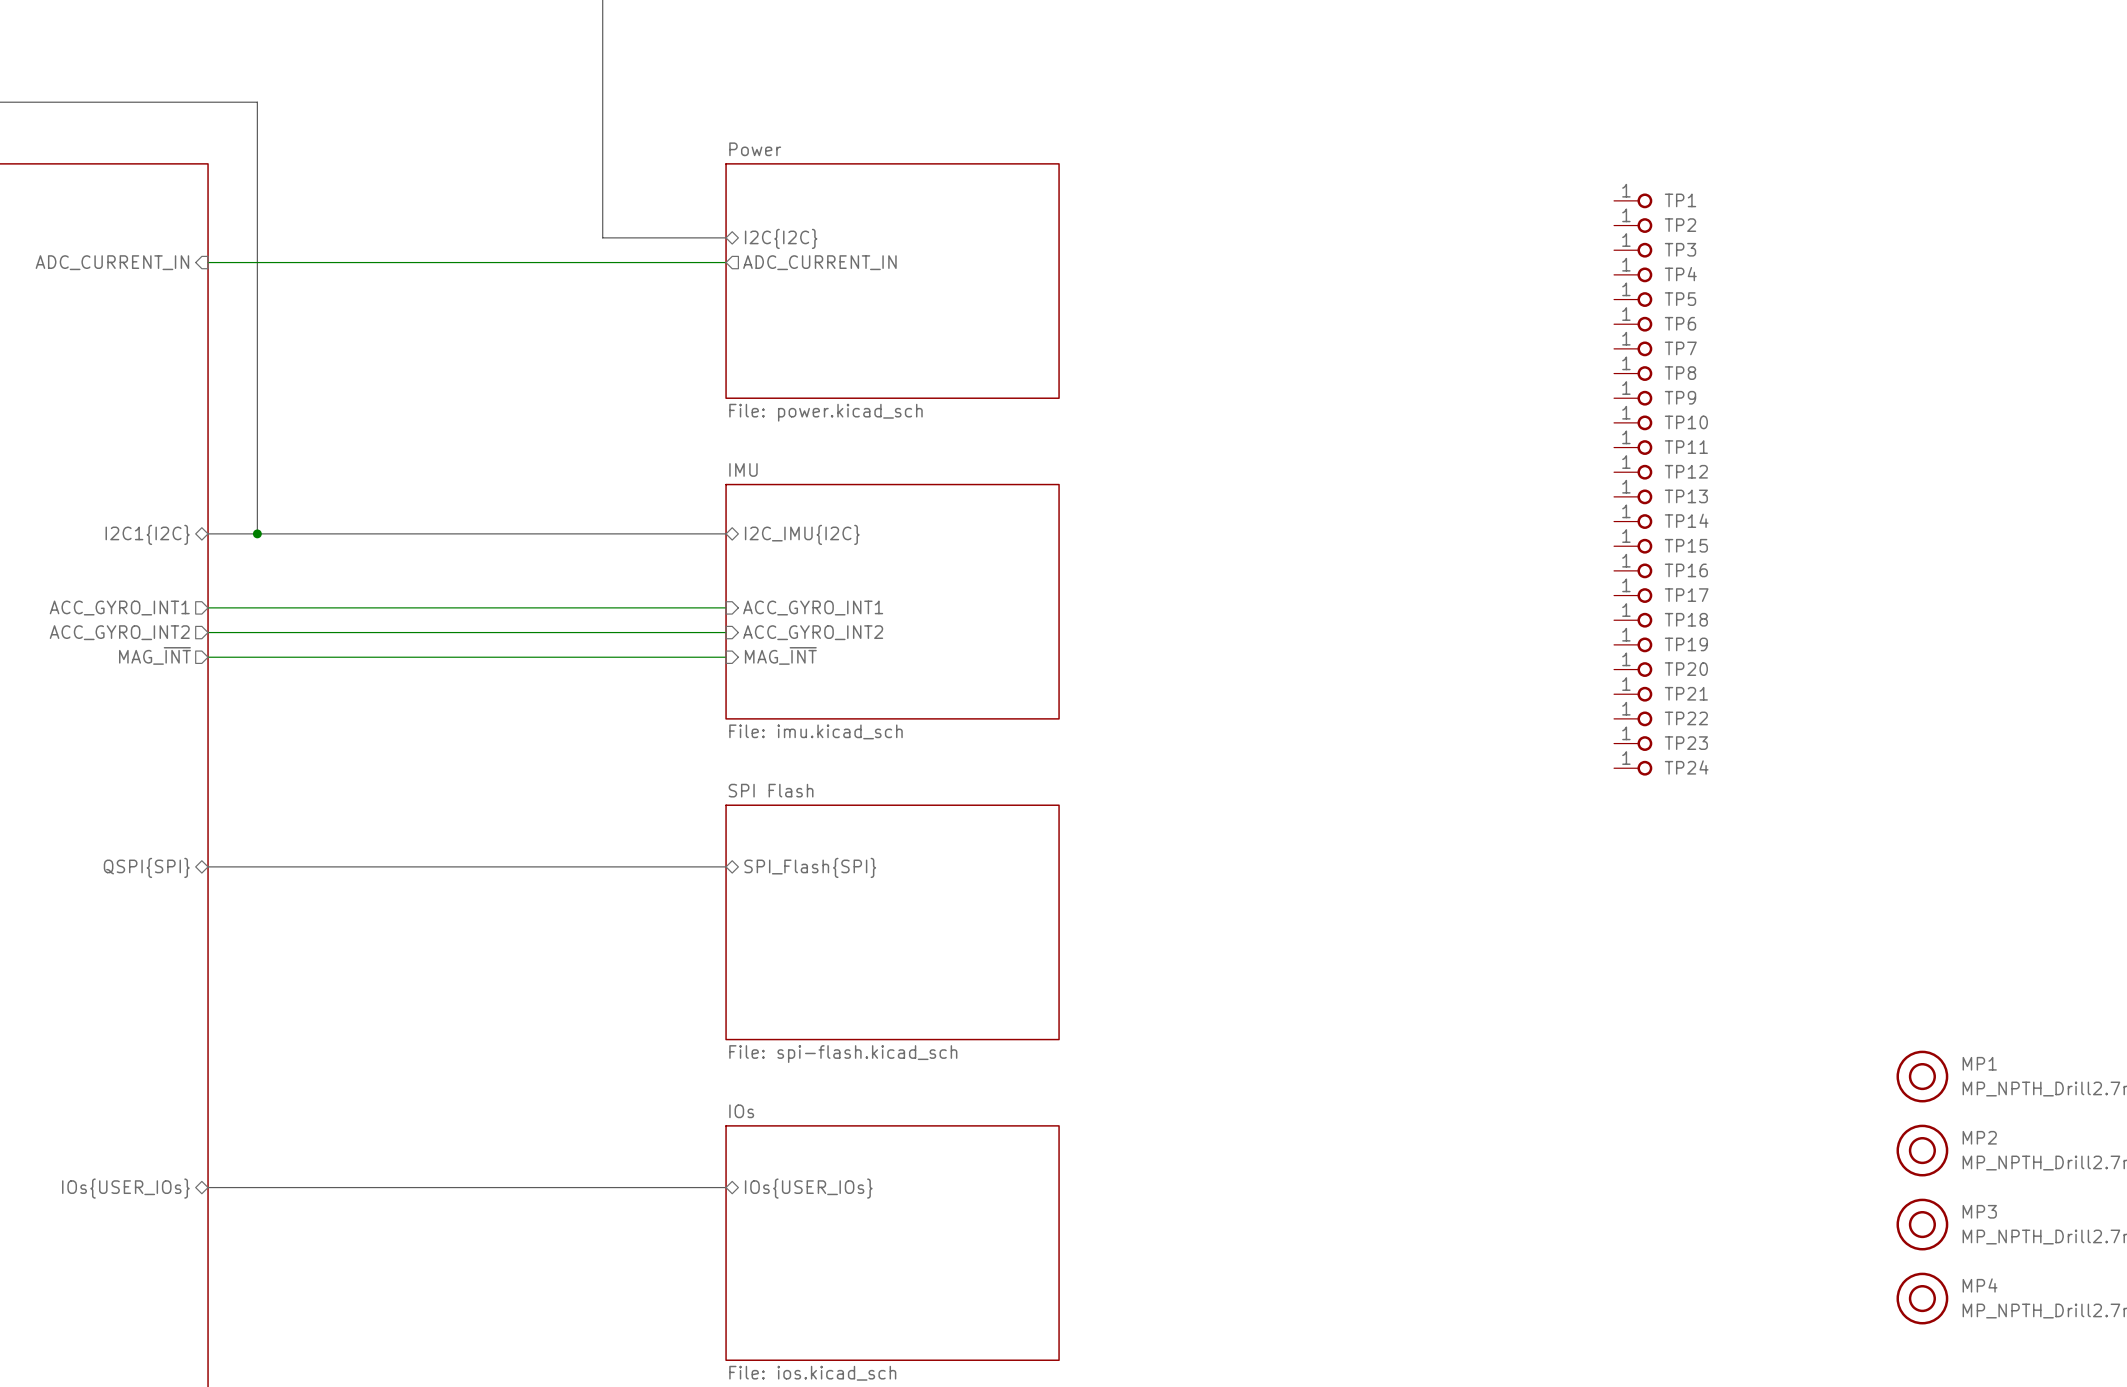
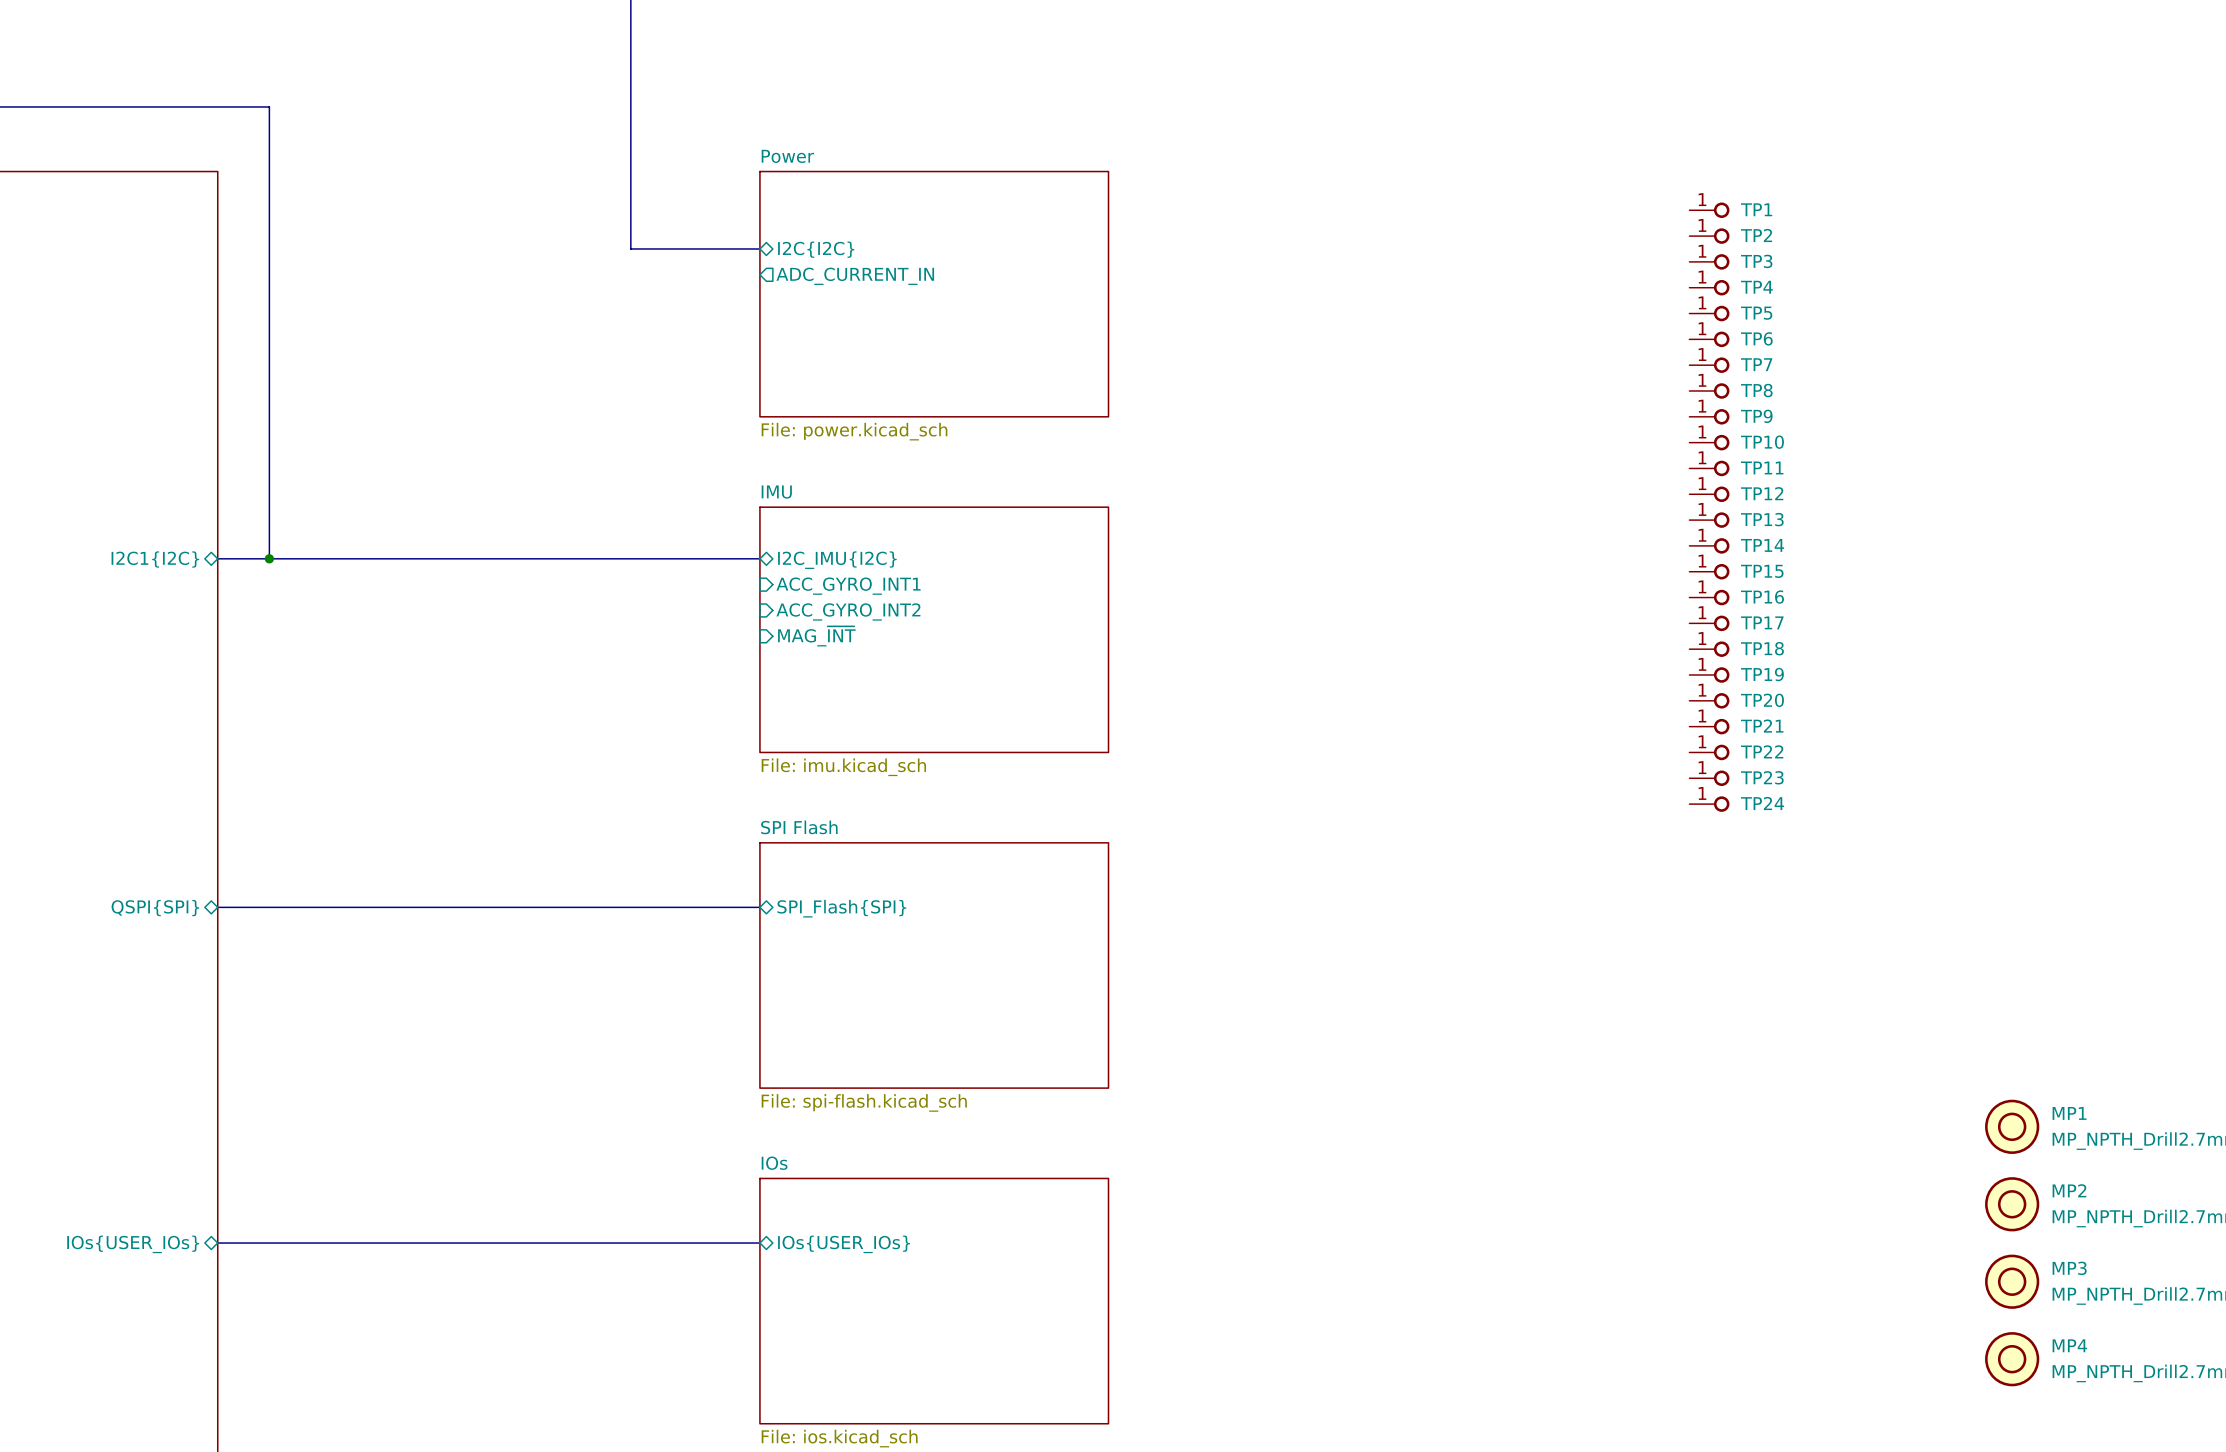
sheet pin: ADC_CURRENT_IN (112, 262) -> none
wire: (208, 262) (726, 262) -> none
sheet pin: none -> ACC_GYRO_INT1 (848, 586)
wire: (208, 607) (726, 607) -> none
sheet pin: ACC_GYRO_INT1 (119, 608) -> none
sheet pin: ACC_GYRO_INT1 (813, 608) -> MAG_~{INT} (816, 636)
sheet pin: ACC_GYRO_INT2 (119, 632) -> none
wire: (208, 632) (726, 632) -> none
sheet pin position: ACC_GYRO_INT2 (813, 632) -> ACC_GYRO_INT2 (848, 611)
sheet pin: MAG_~{INT} (154, 655) -> none
sheet pin: MAG_~{INT} (780, 655) -> none
wire: (208, 657) (726, 657) -> none

